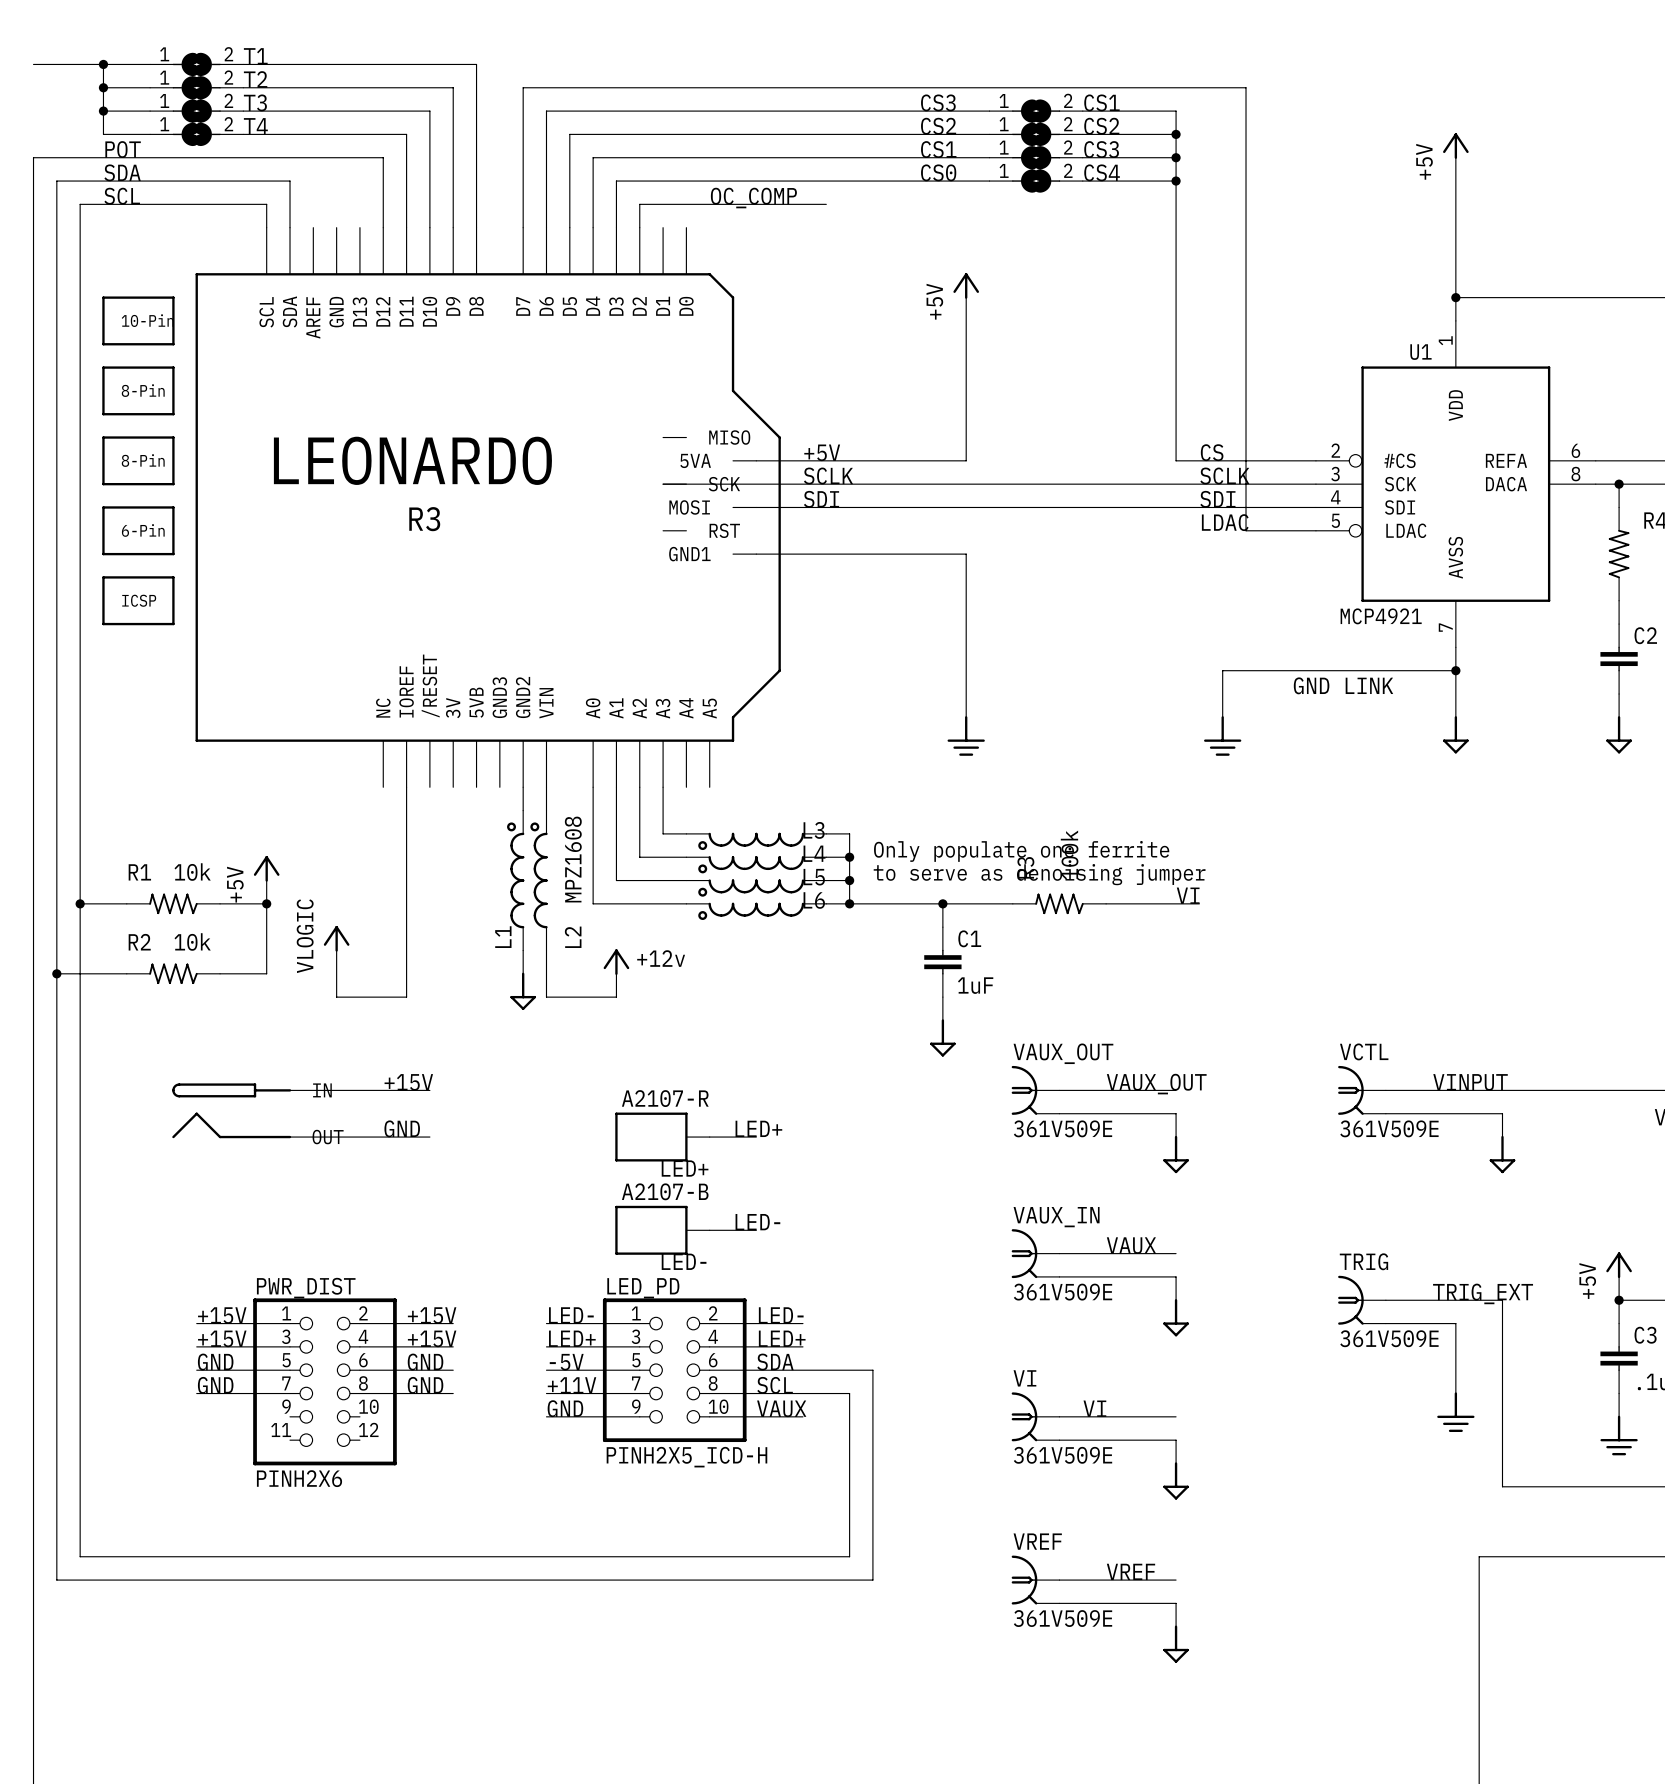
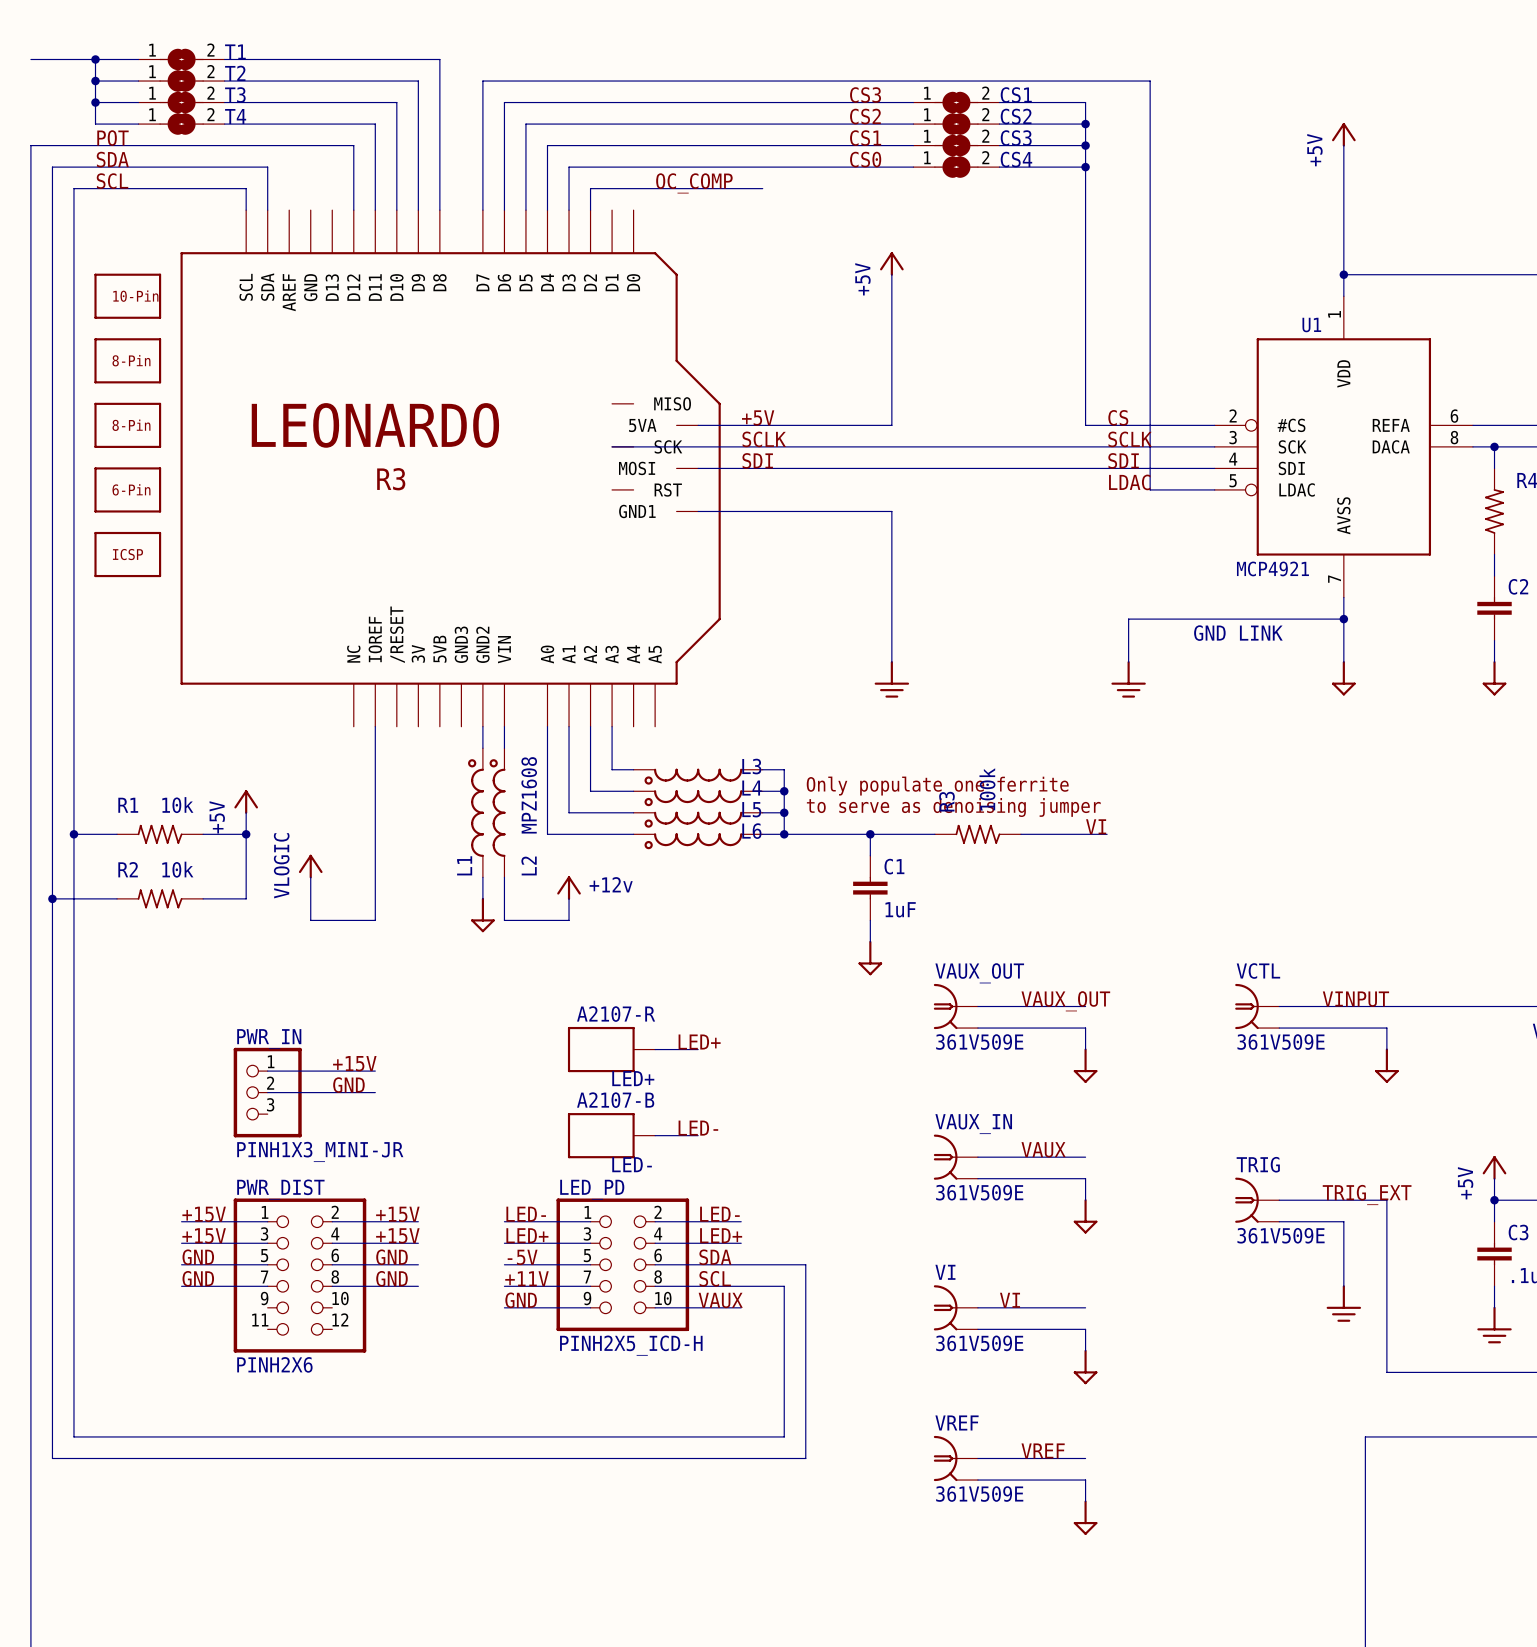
label position: +15V (408, 1082) -> +15V (354, 1063)
wire: (290, 1090) (429, 1090) -> none
part: (231, 1110) -> none
label position: GND (402, 1128) -> GND (348, 1085)
wire: (290, 1137) (429, 1137) -> none
wire: none -> (267, 1071) (375, 1071)
wire: none -> (267, 1092) (375, 1092)
PWR_IN: none -> PINH1X3_MINI-JR (267, 1092)

